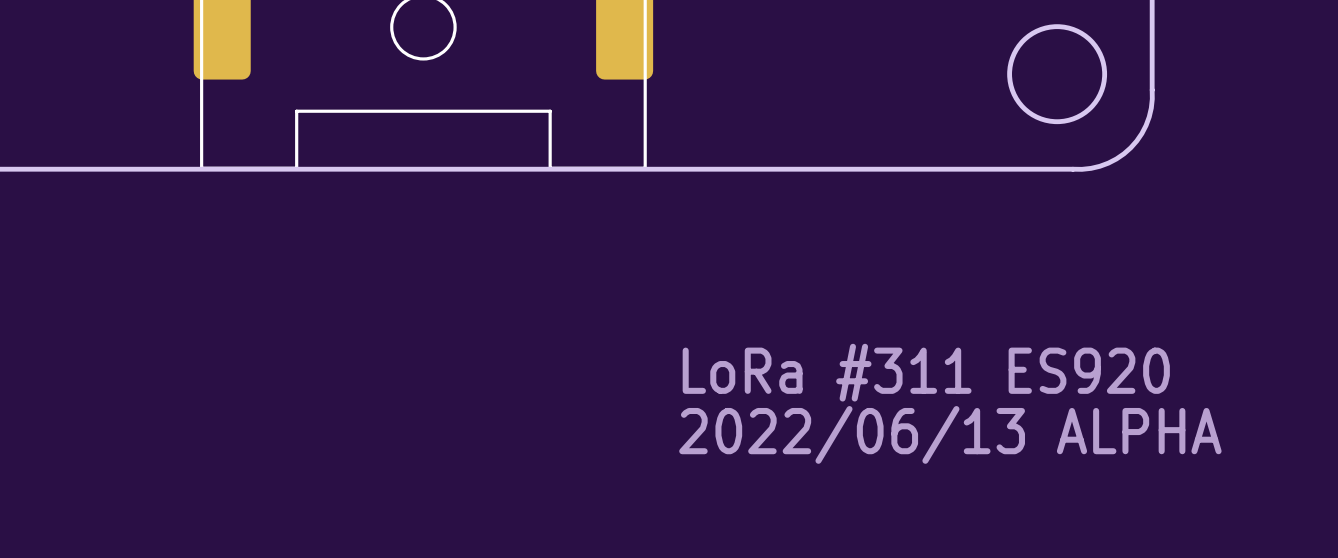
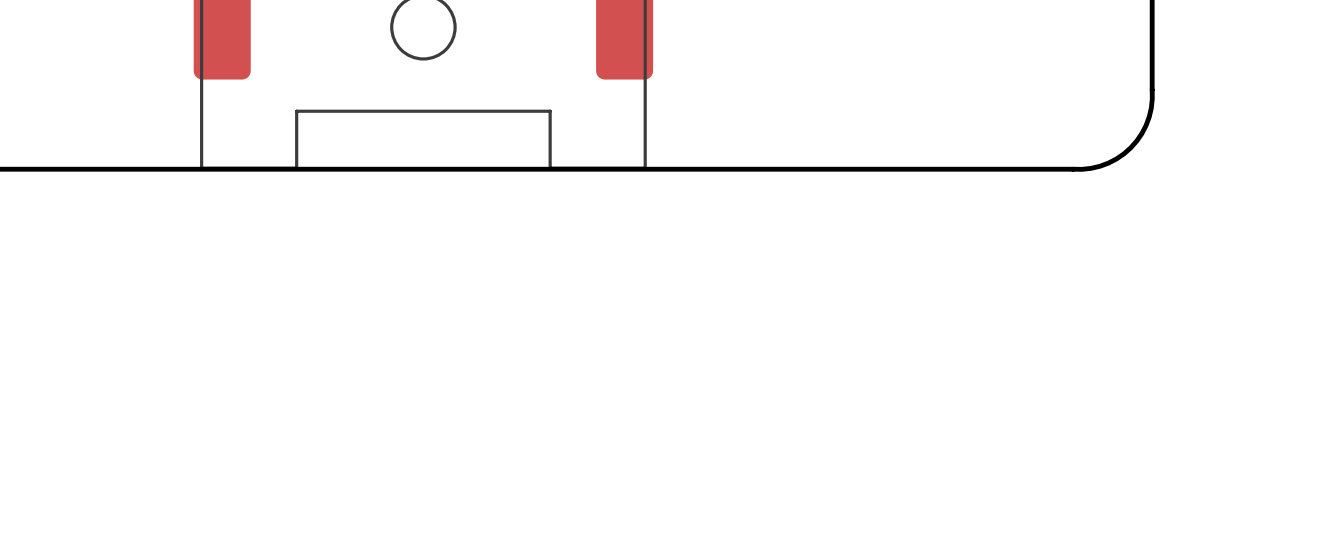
round board edge: [1007, 24, 1108, 125] -> none
text: LoRa #311 ES920 (926, 372) -> none
text: 2022/06/13 ALPHA (950, 434) -> none

